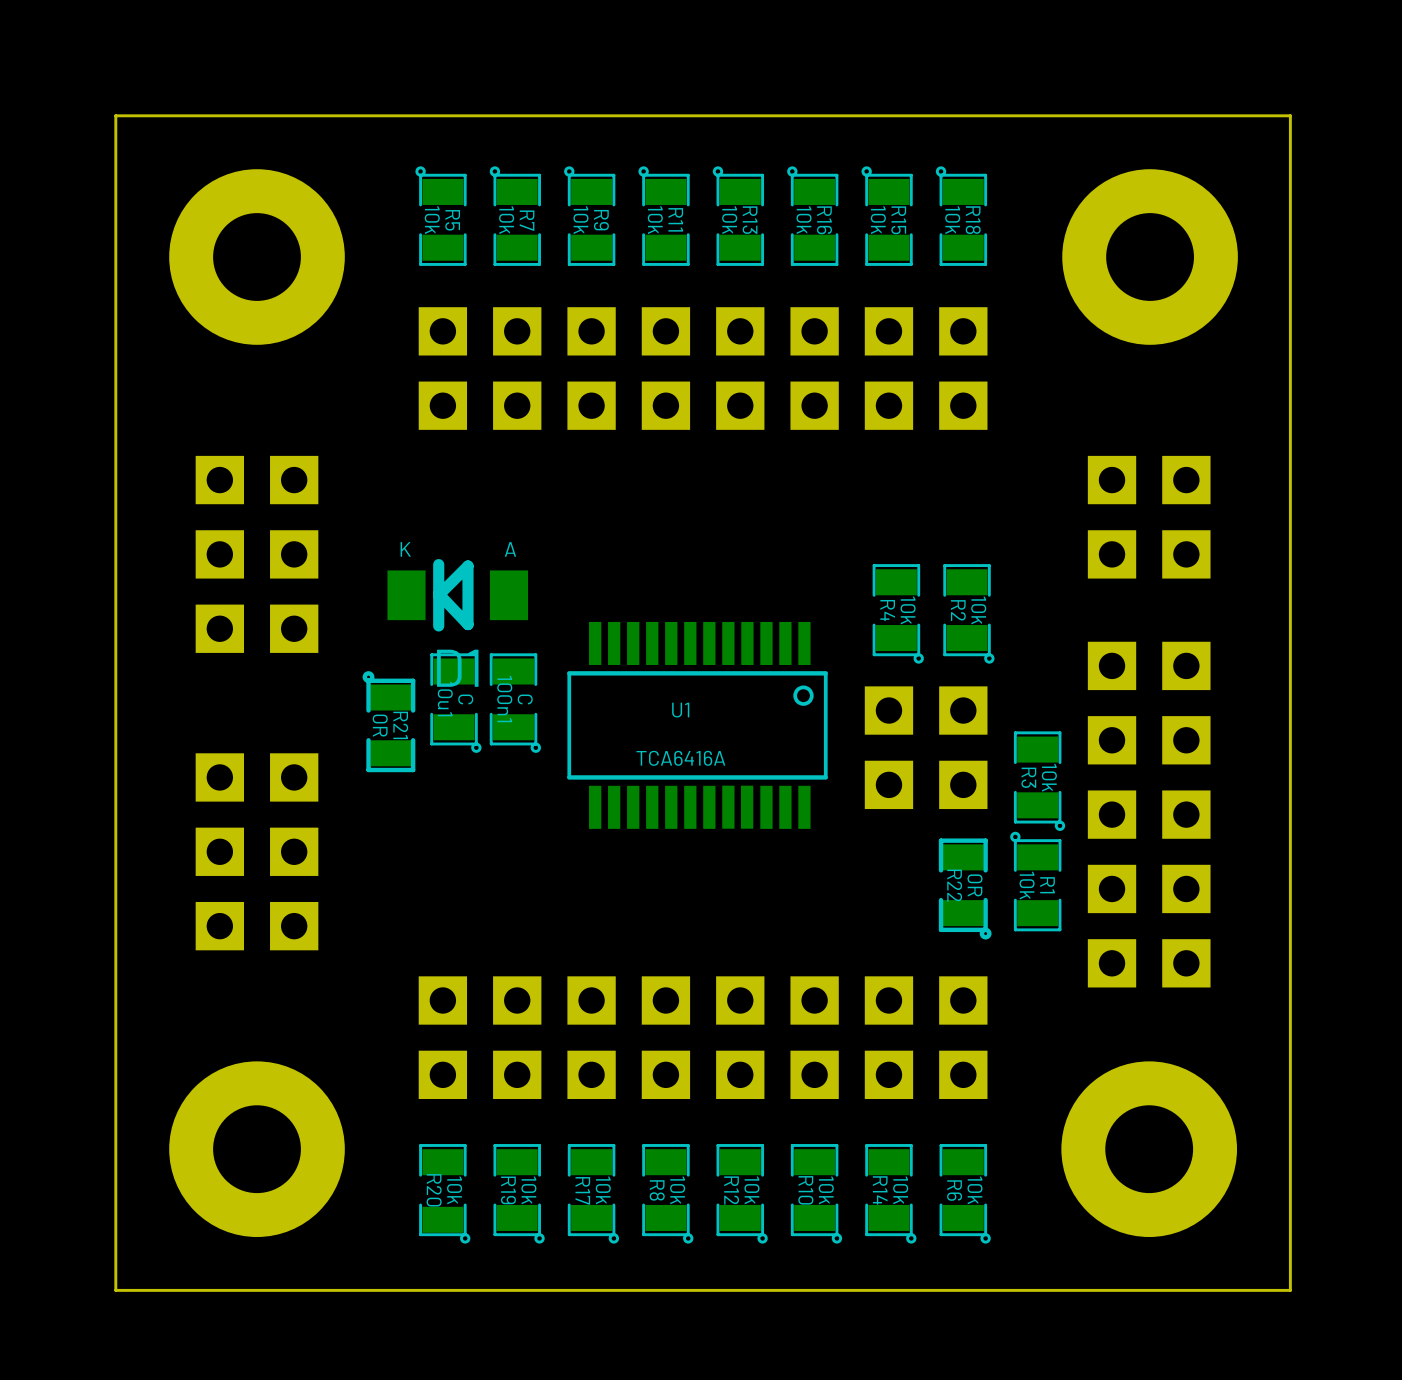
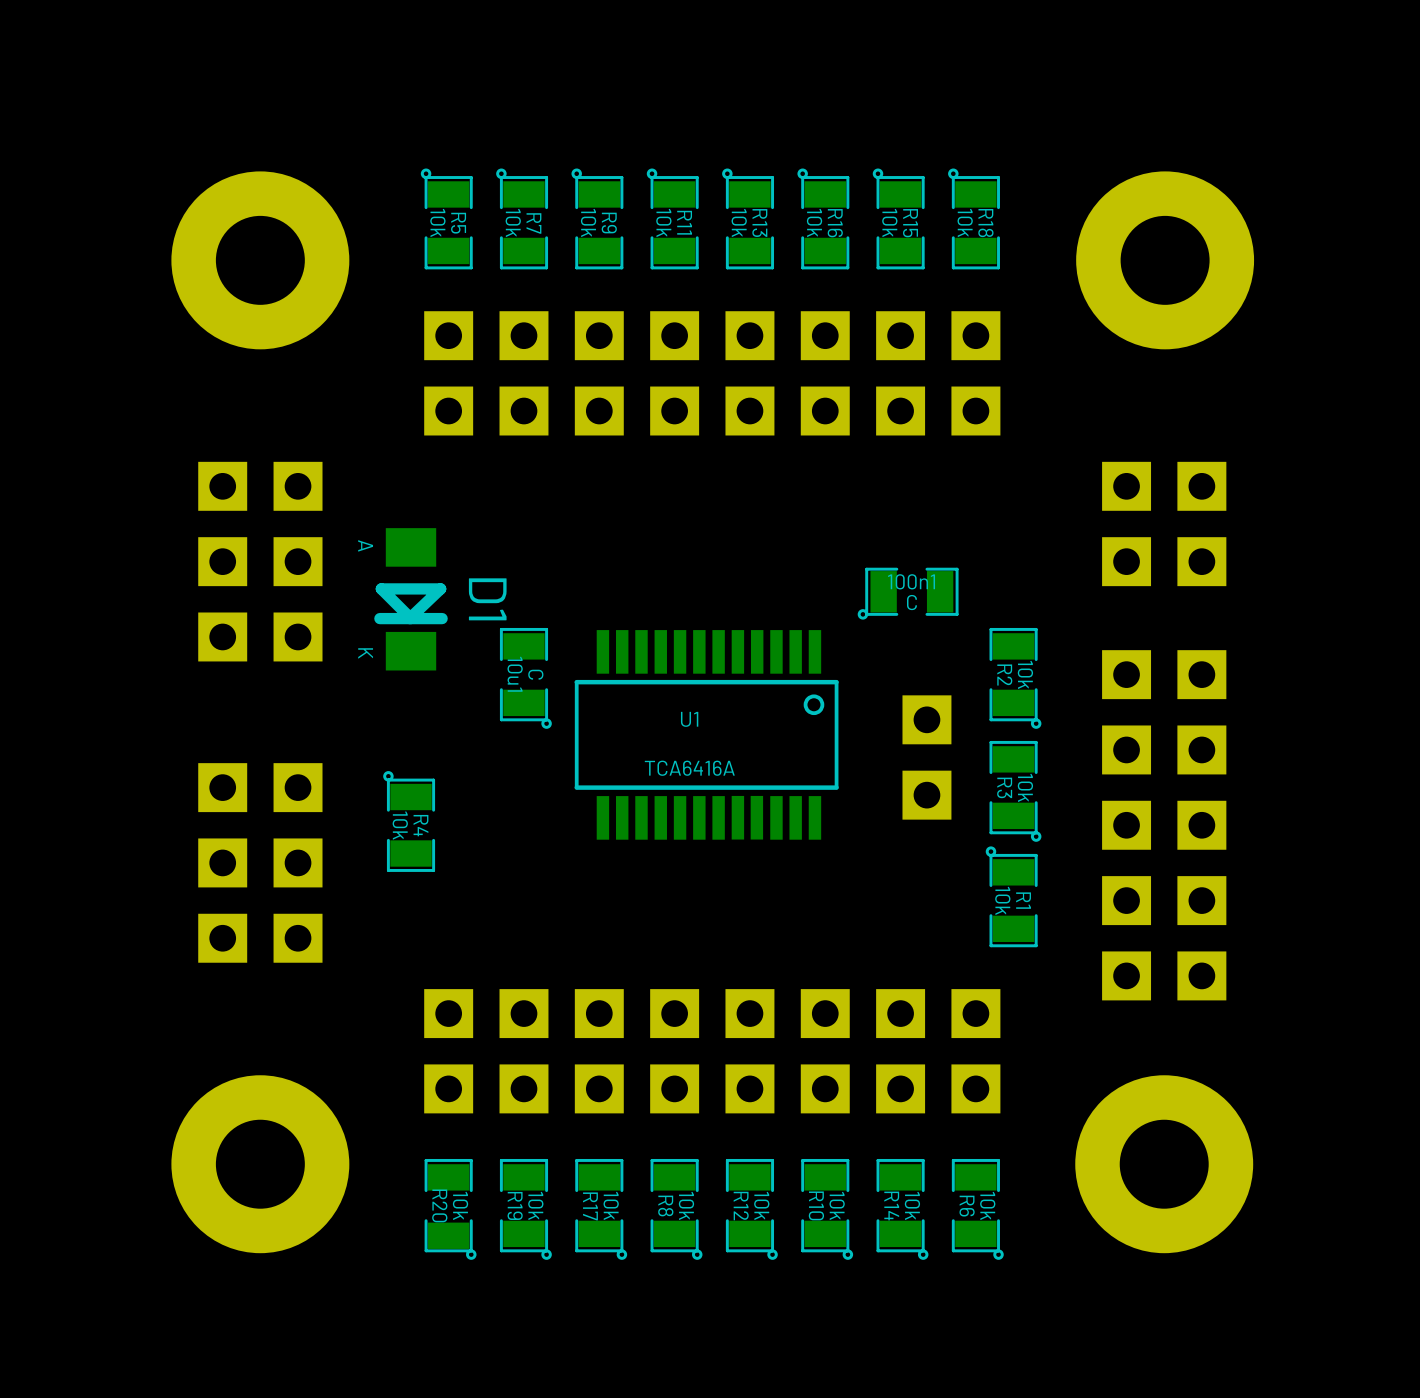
board edge: (1290, 115) (1290, 1290) (115, 1290) (115, 115) (1290, 115) -> none
D1 rotation: 0° (457, 595) -> 90° counterclockwise (411, 599)
R4 rotation: 0° (898, 613) -> 180° (409, 821)
R4 position: (898, 613) -> (409, 821)
R2 position: (968, 613) -> (1015, 678)
10u1 position: (455, 703) -> (525, 678)
100n1 rotation: 0° (515, 703) -> 90° clockwise (908, 593)
100n1 position: (515, 703) -> (908, 593)
R21: 0R (388, 721) -> none
part: (888, 747) -> none
part: none -> (926, 757)
part: (963, 747) -> none
R3 position: (1039, 781) -> (1015, 791)
R1 position: (1035, 881) -> (1011, 896)
R22: 0R (965, 888) -> none

